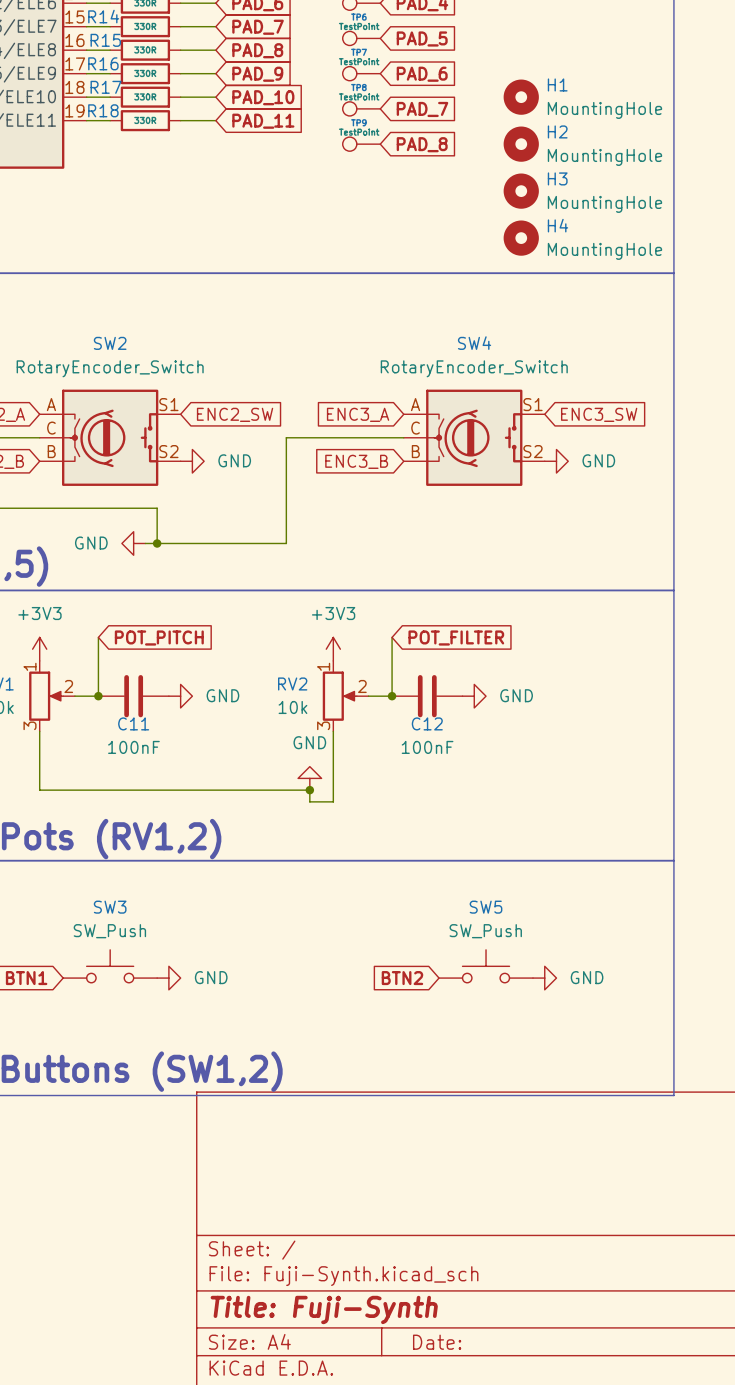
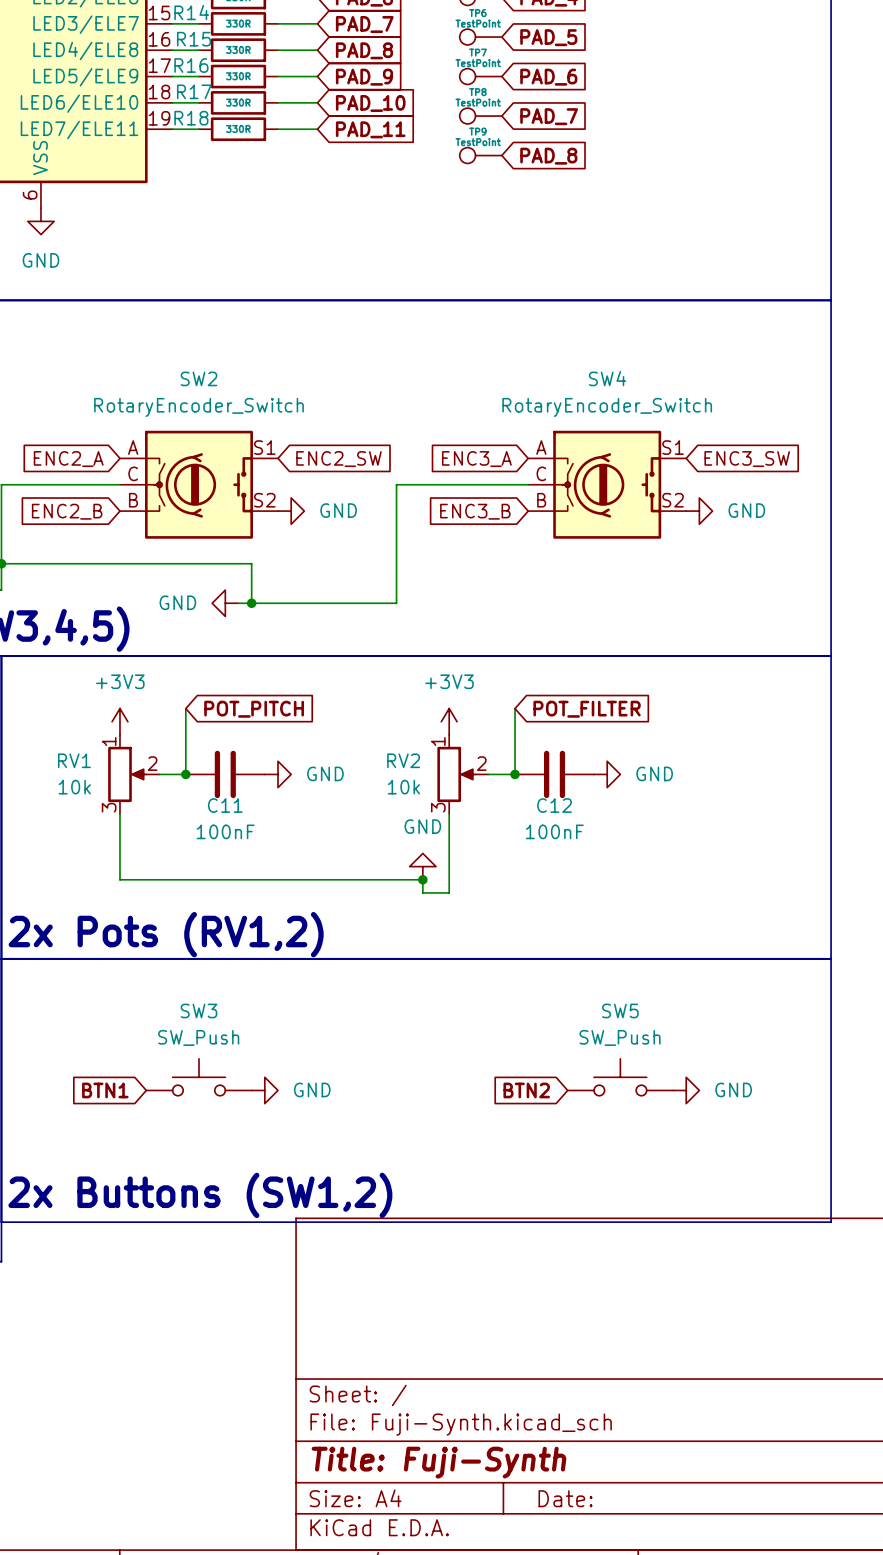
H1: MountingHole (521, 97) -> none
H2: MountingHole (521, 144) -> none
H3: MountingHole (521, 191) -> none
H4: MountingHole (521, 238) -> none

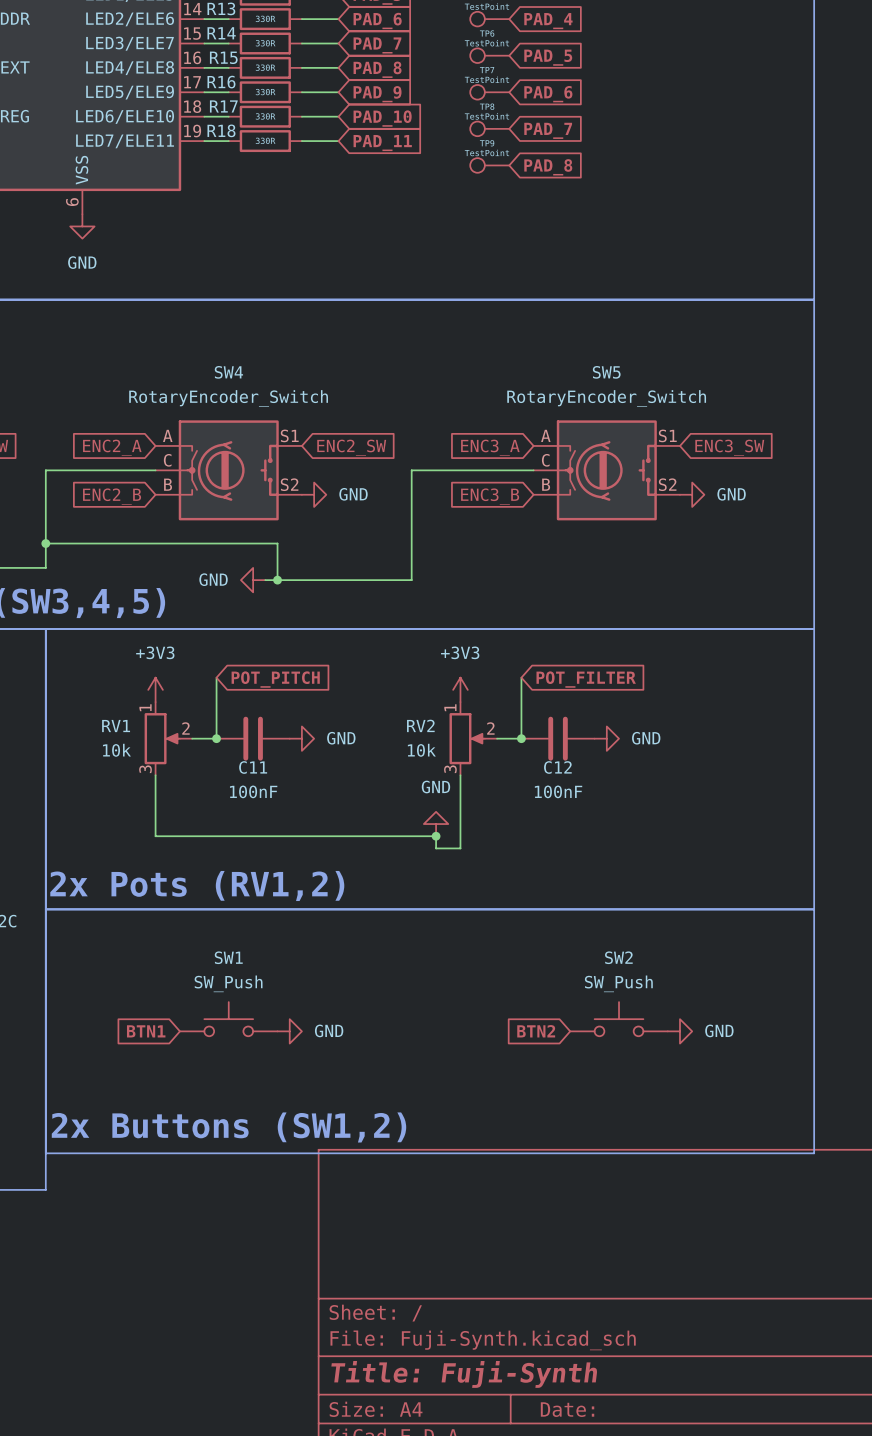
SW2 name: SW2 (198, 378) -> SW4 (228, 372)
SW4 name: SW4 (607, 378) -> SW5 (606, 372)
SW3 name: SW3 (198, 1010) -> SW1 (228, 957)
SW5 name: SW5 (620, 1010) -> SW2 (618, 957)

